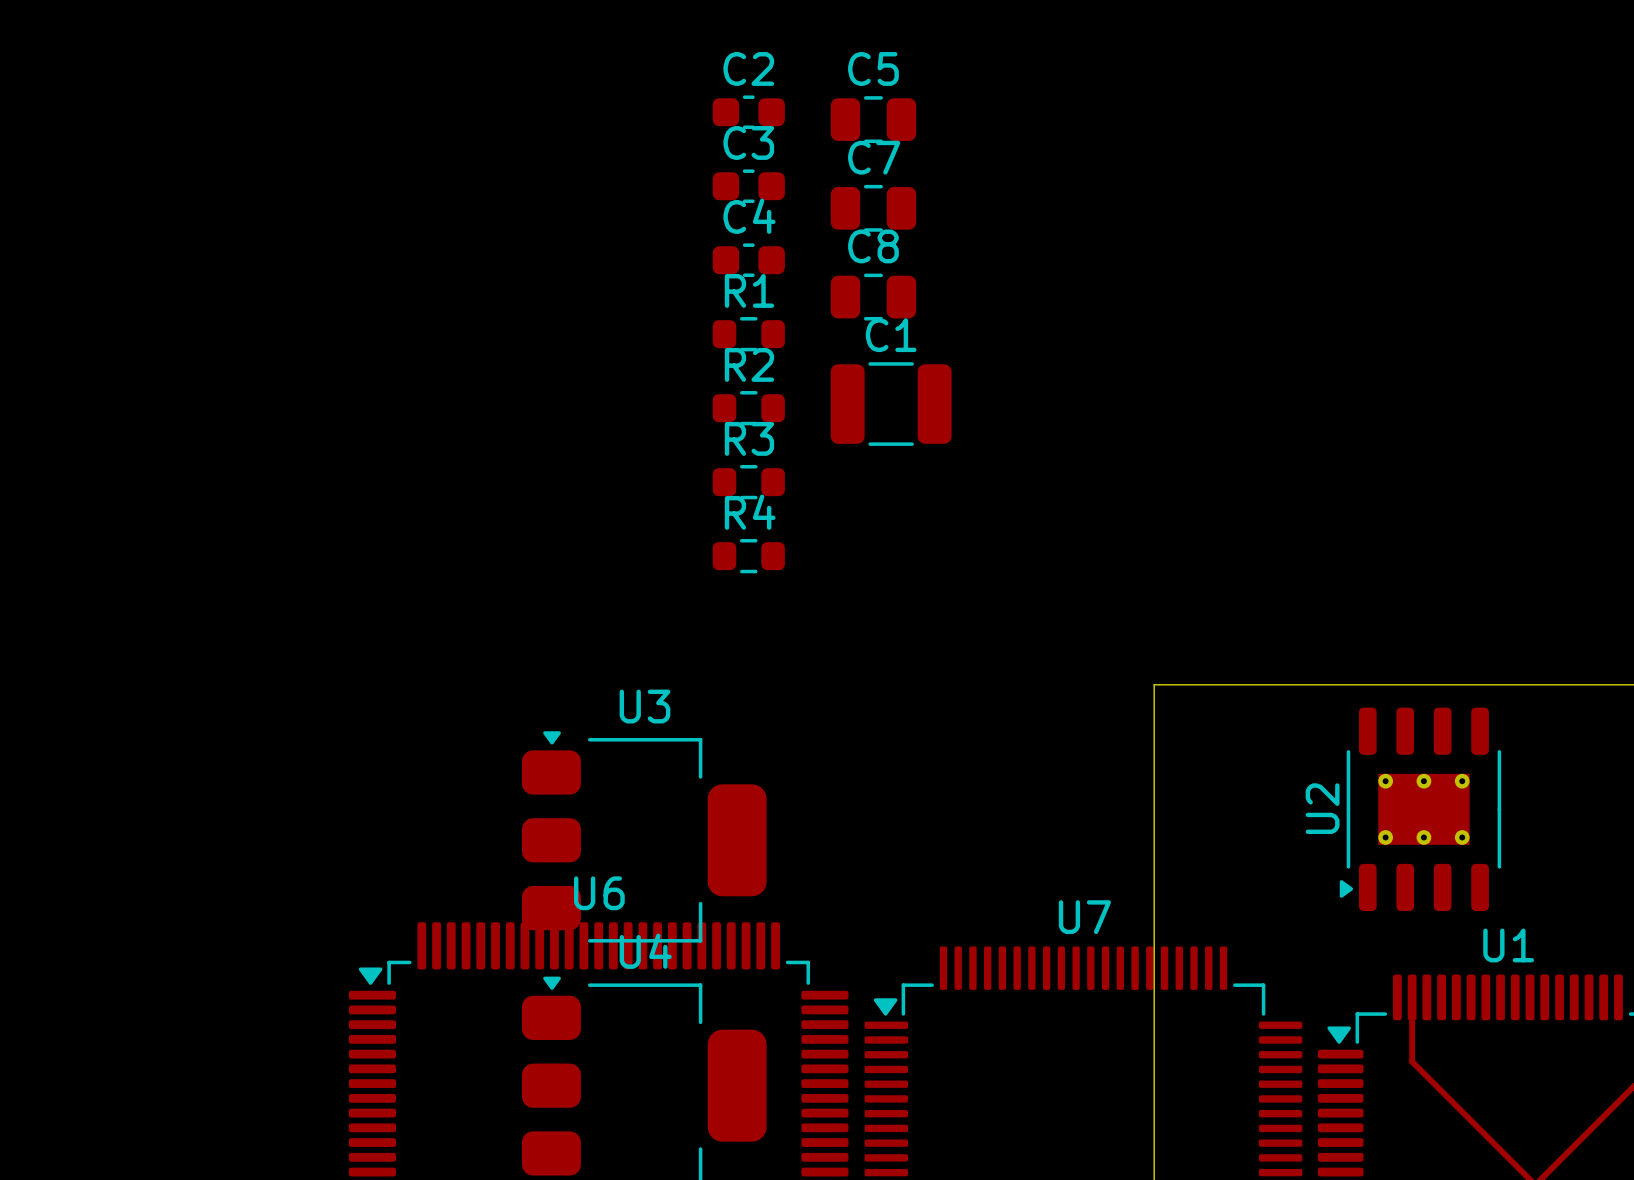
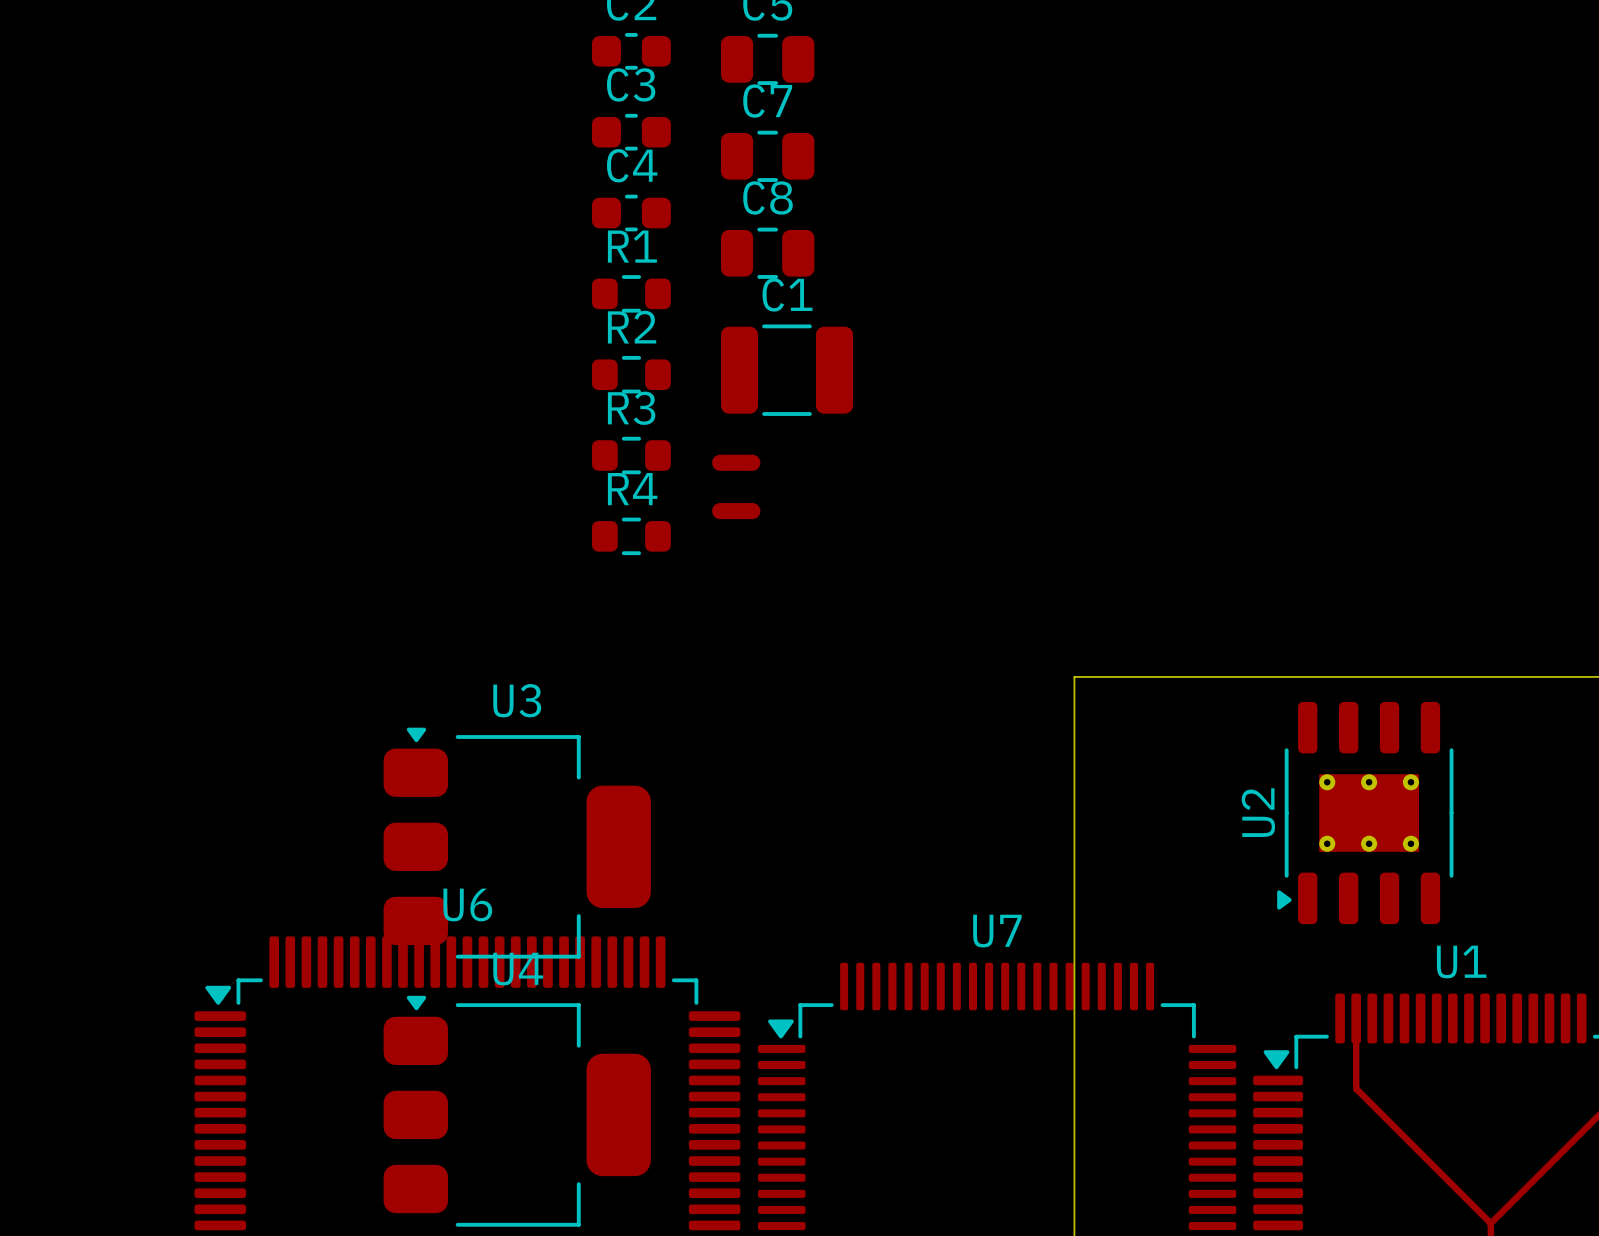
part: none -> (736, 462)
part: none -> (736, 511)

